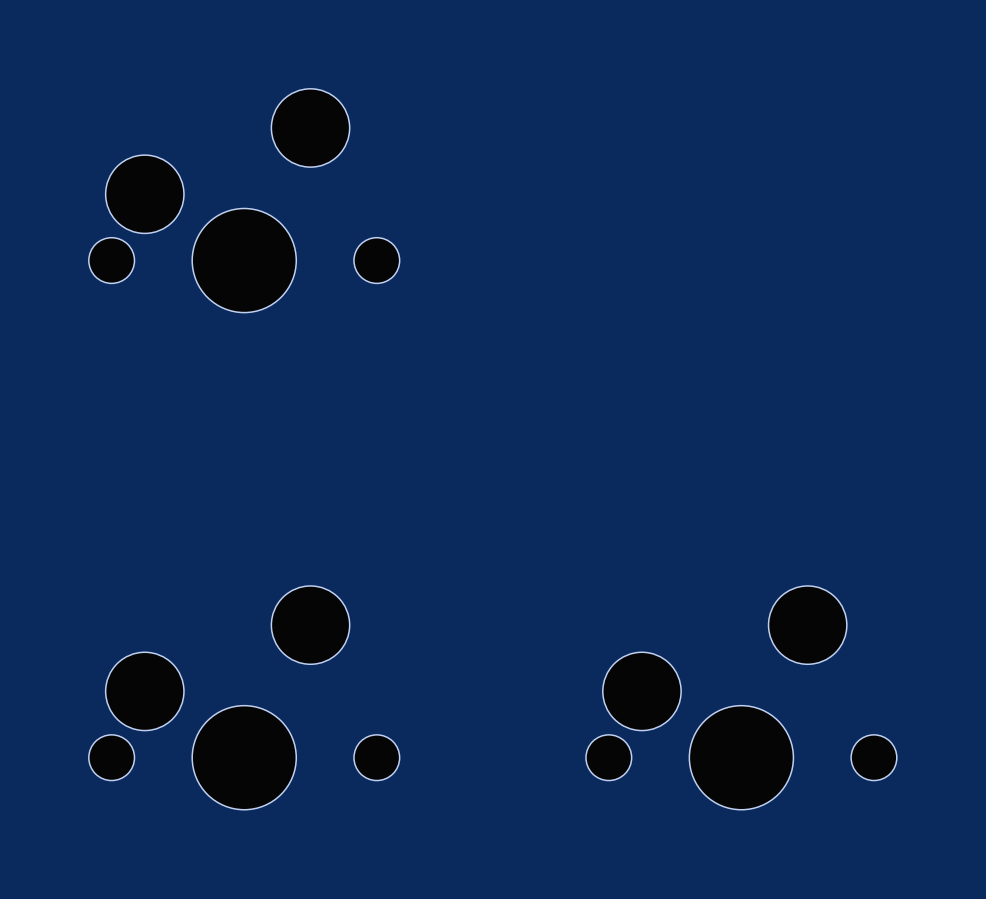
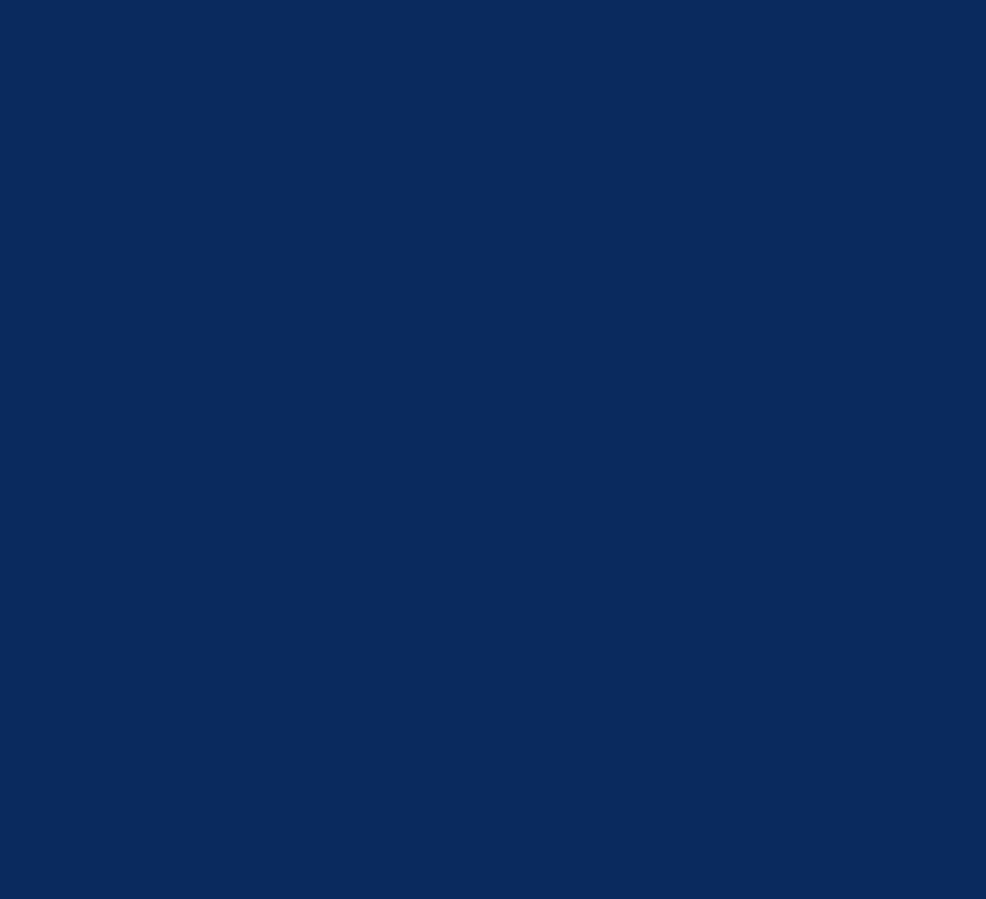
part: (244, 200) -> none
part: (244, 697) -> none
part: (741, 697) -> none

